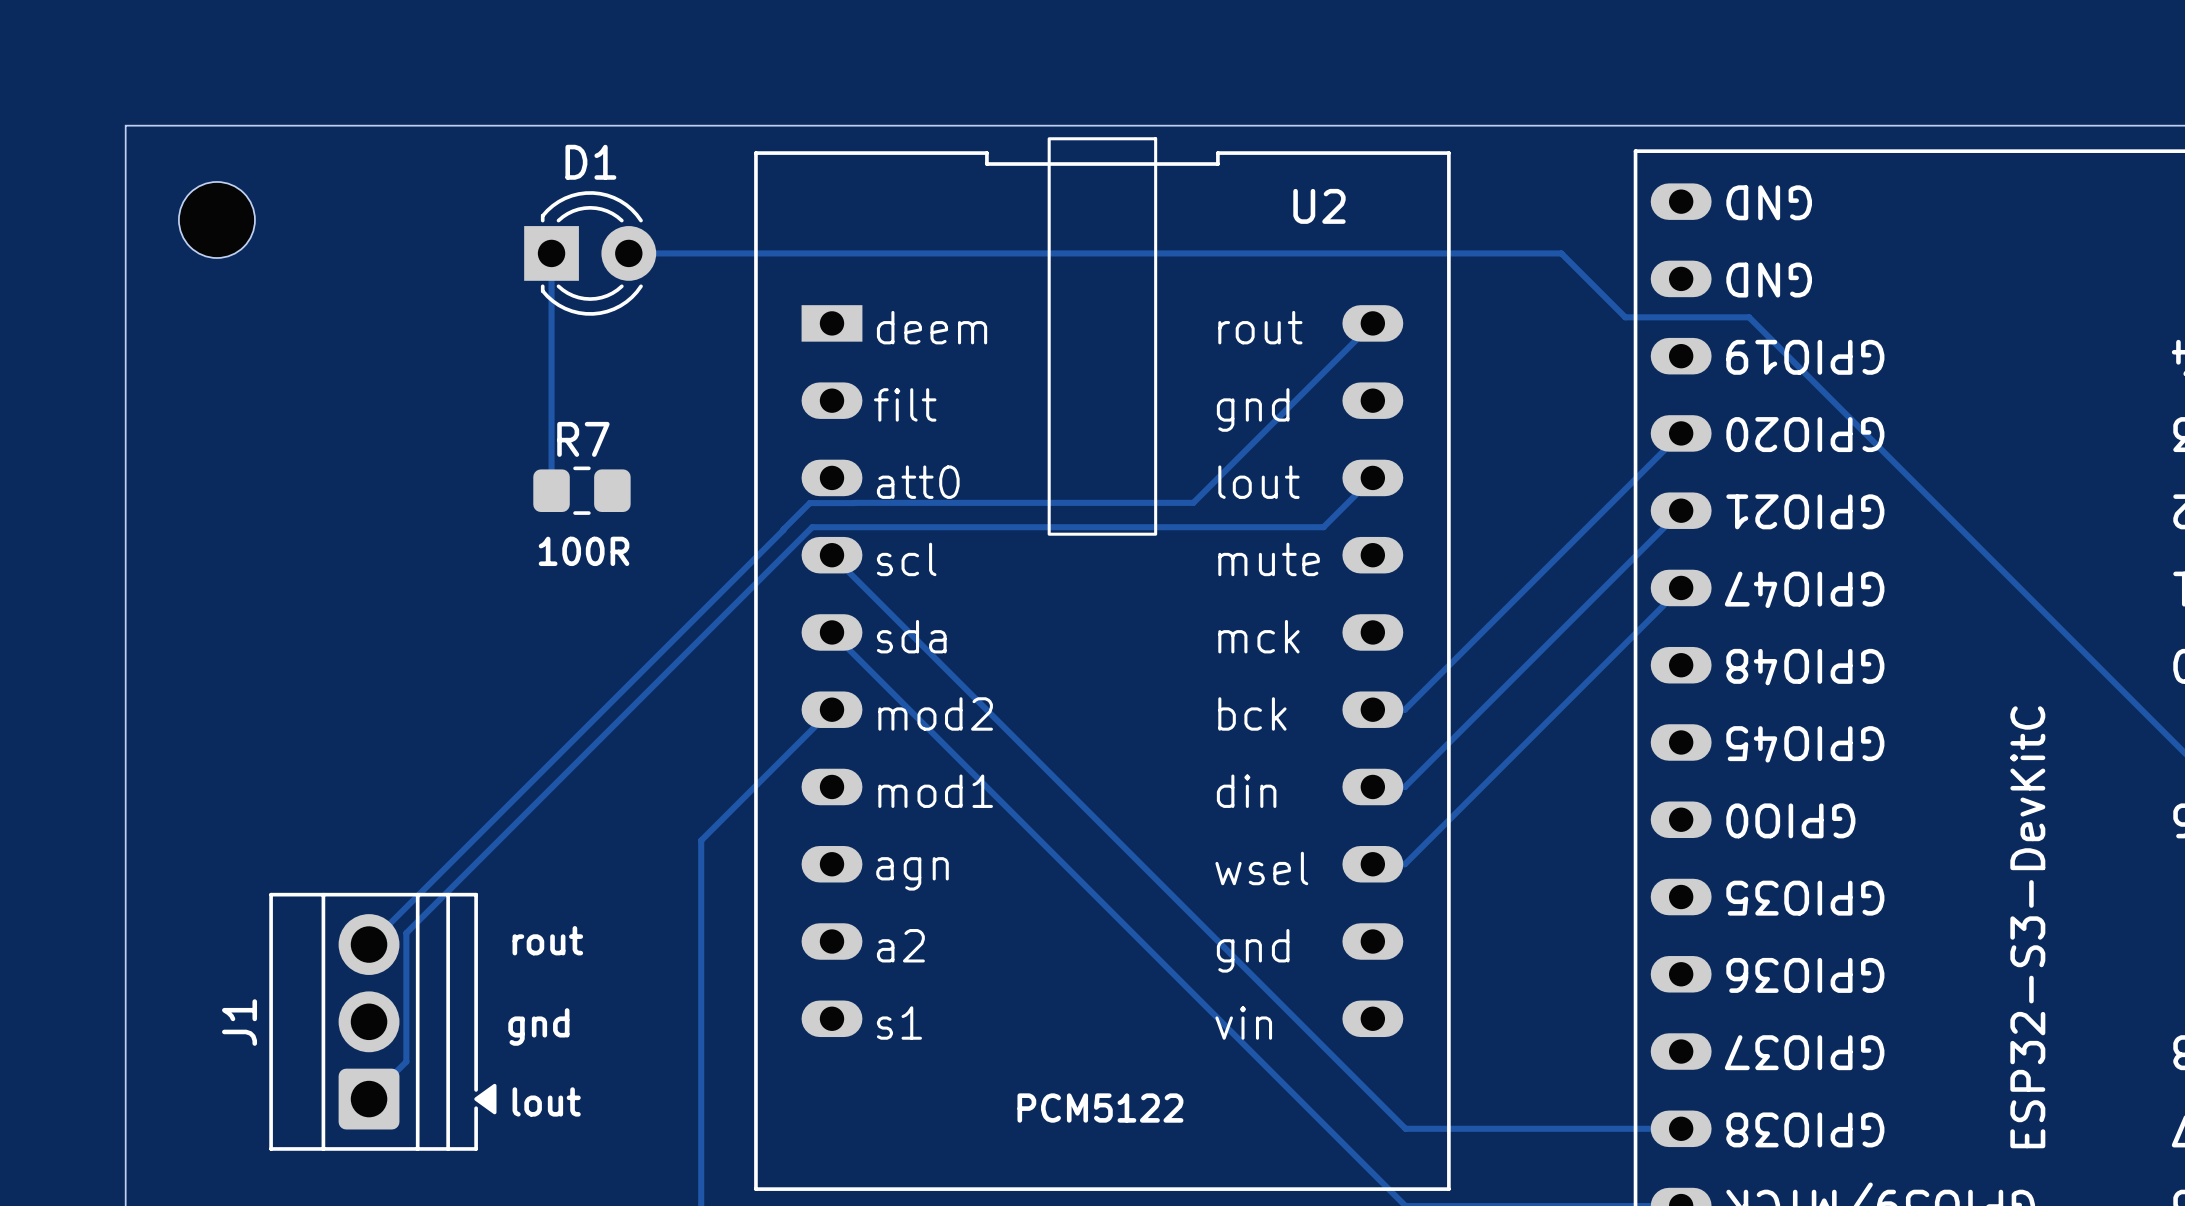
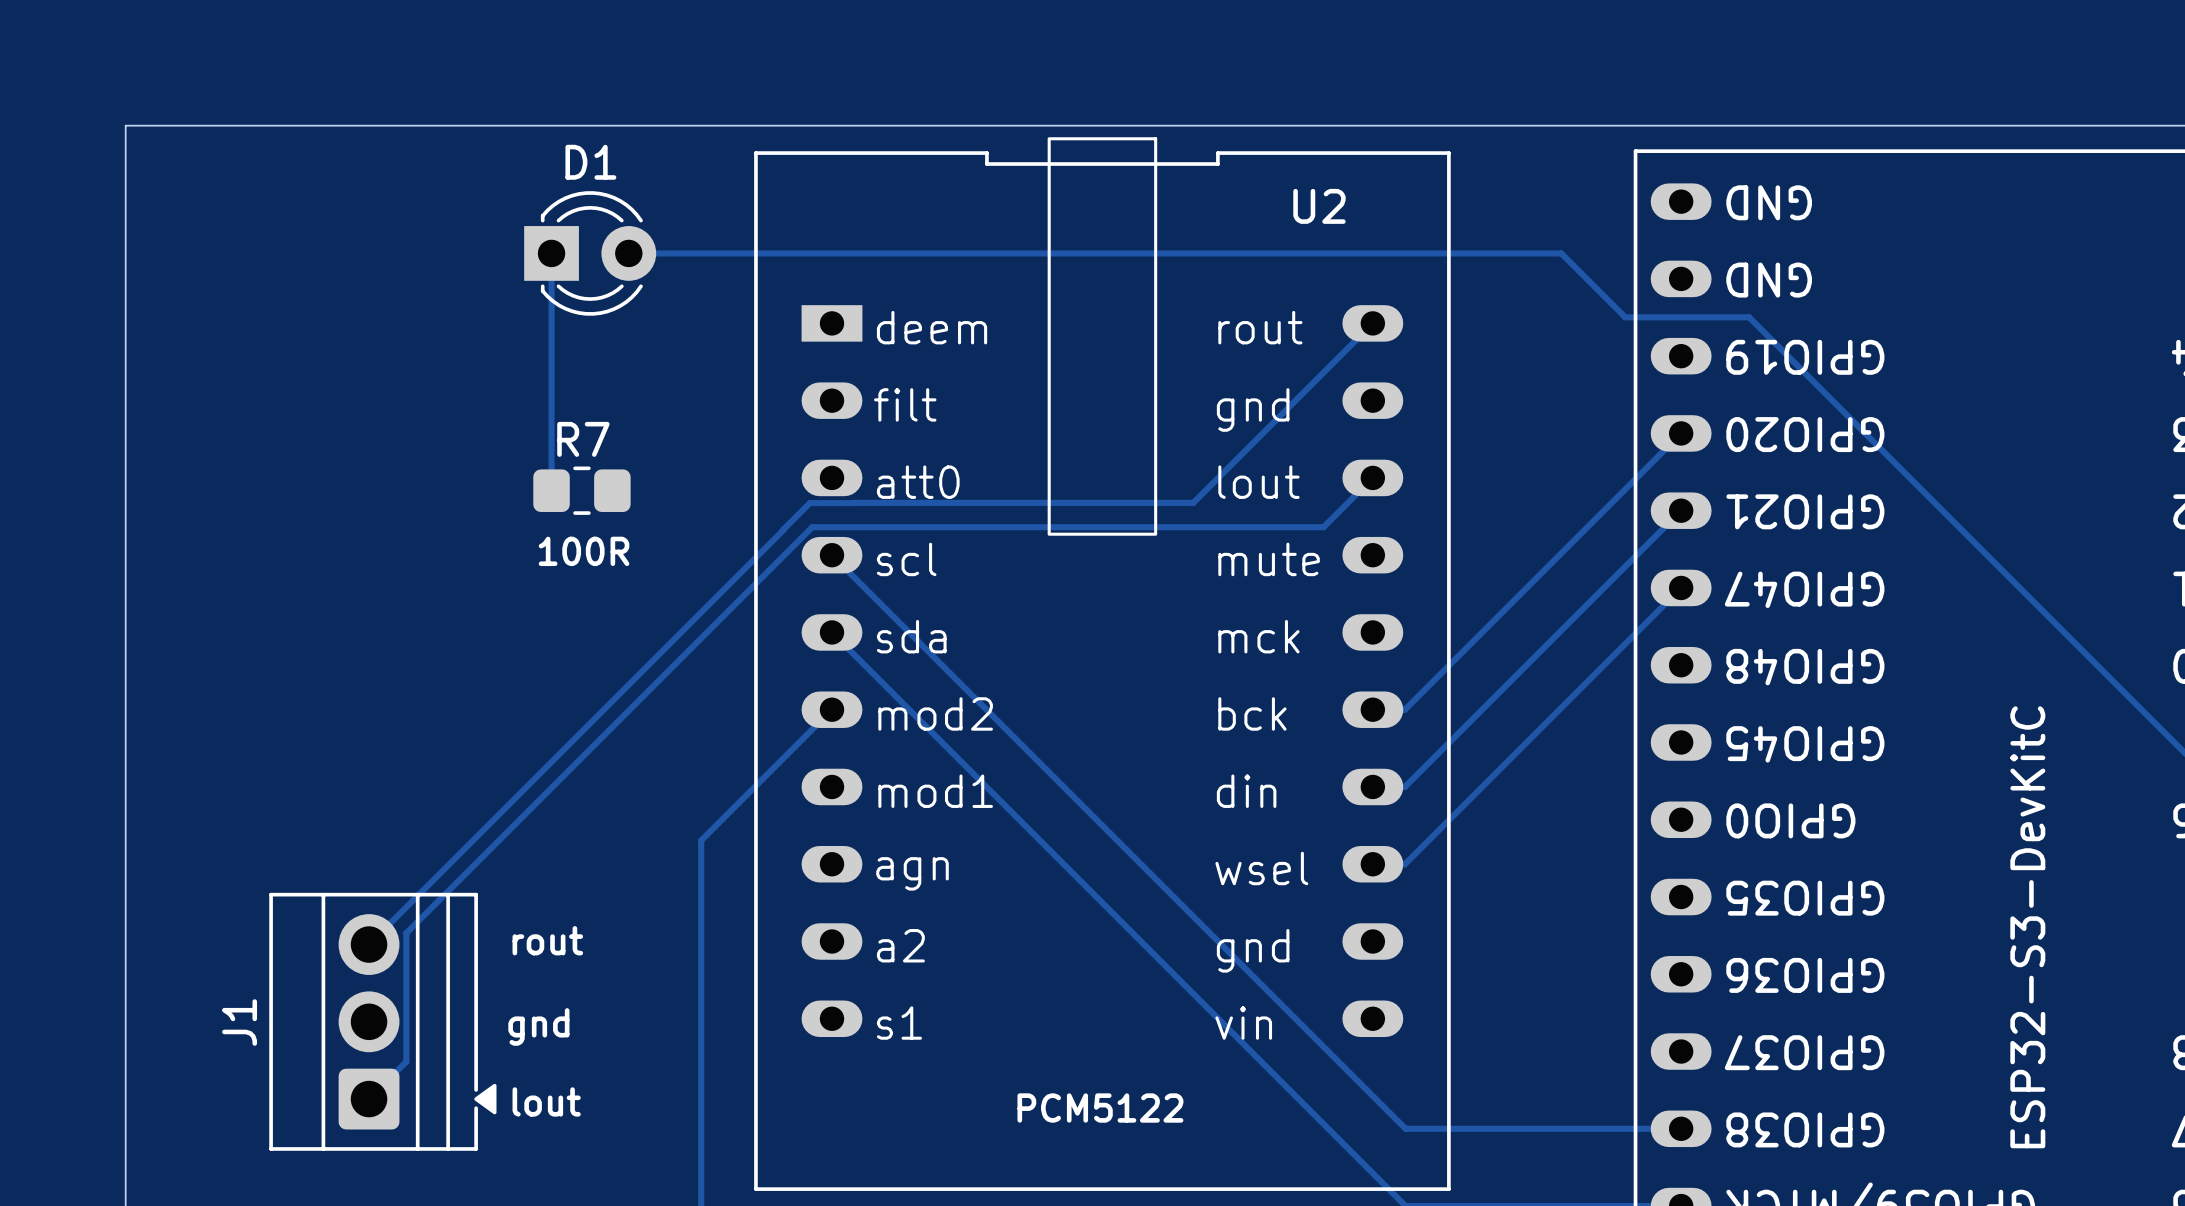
part: (216, 219) -> none

